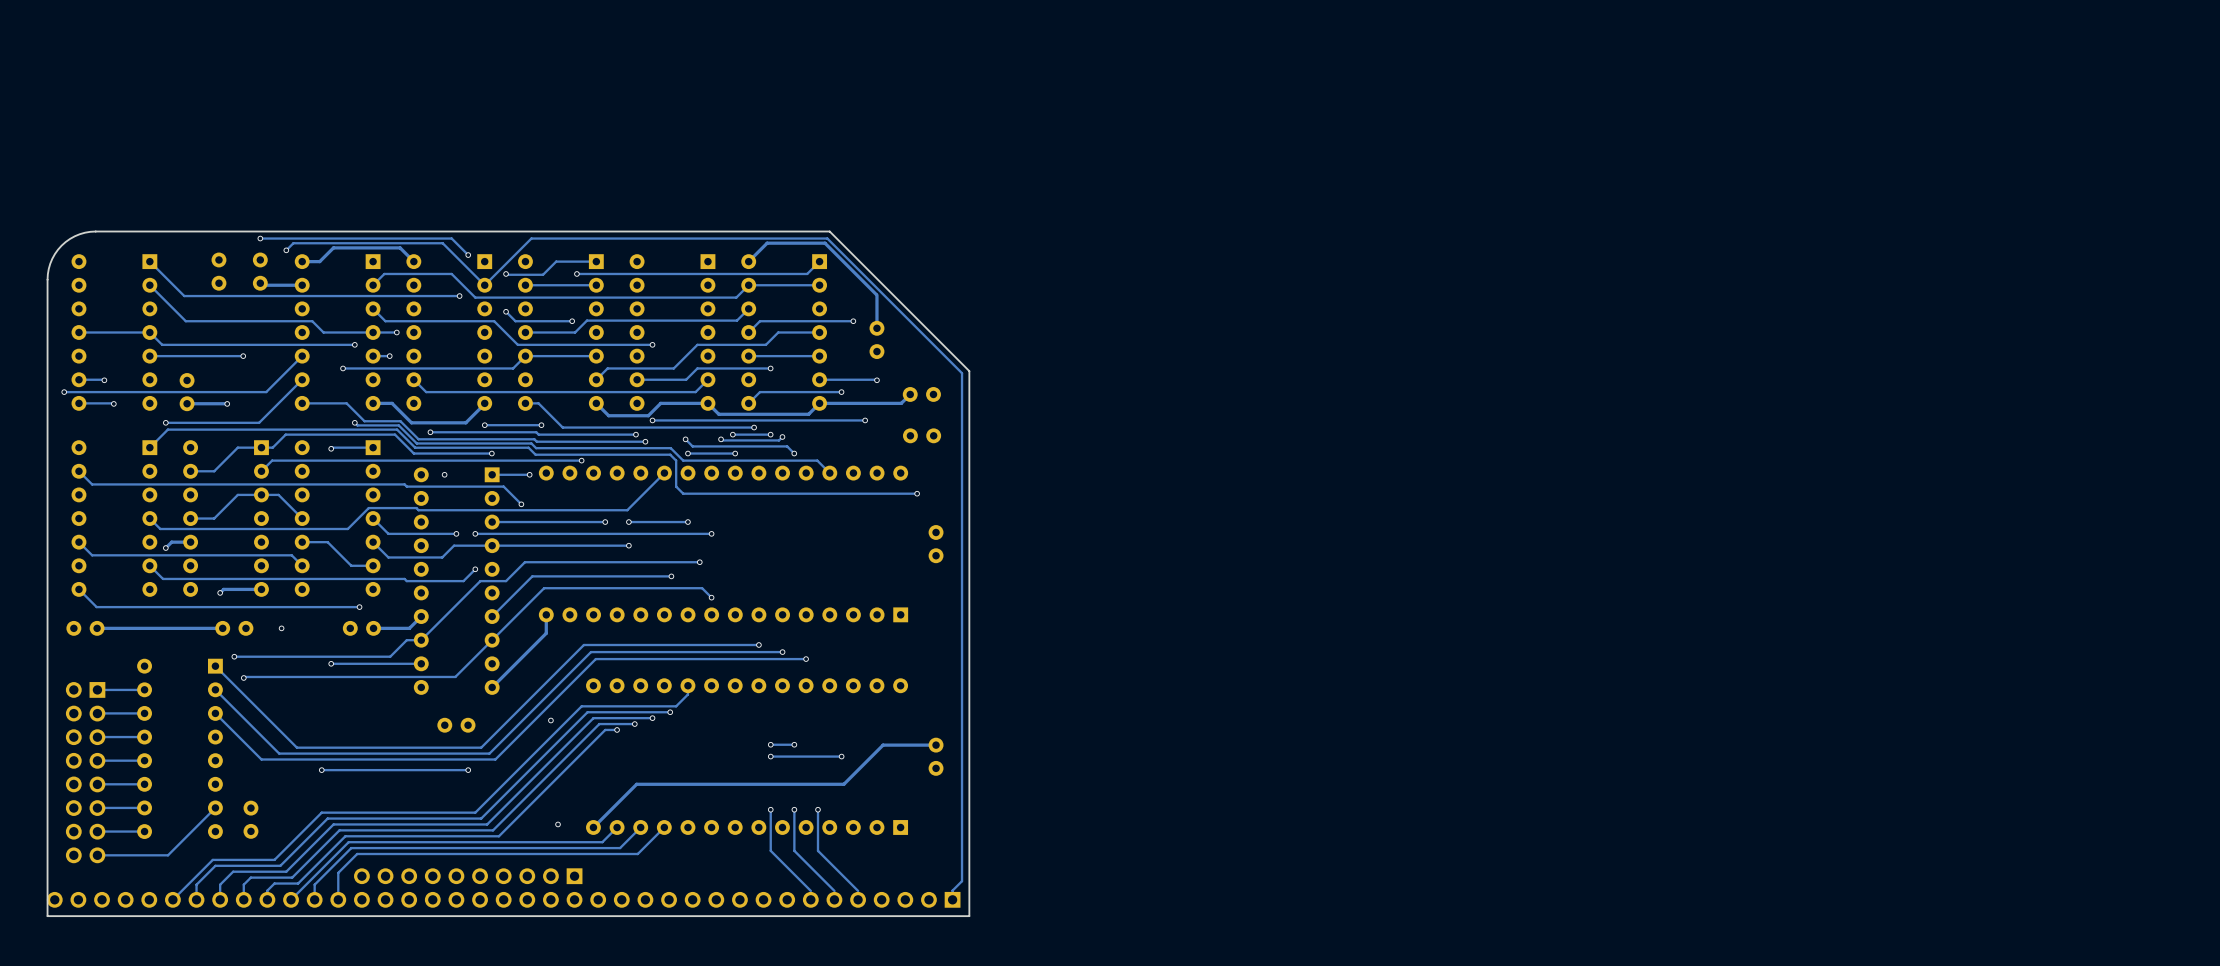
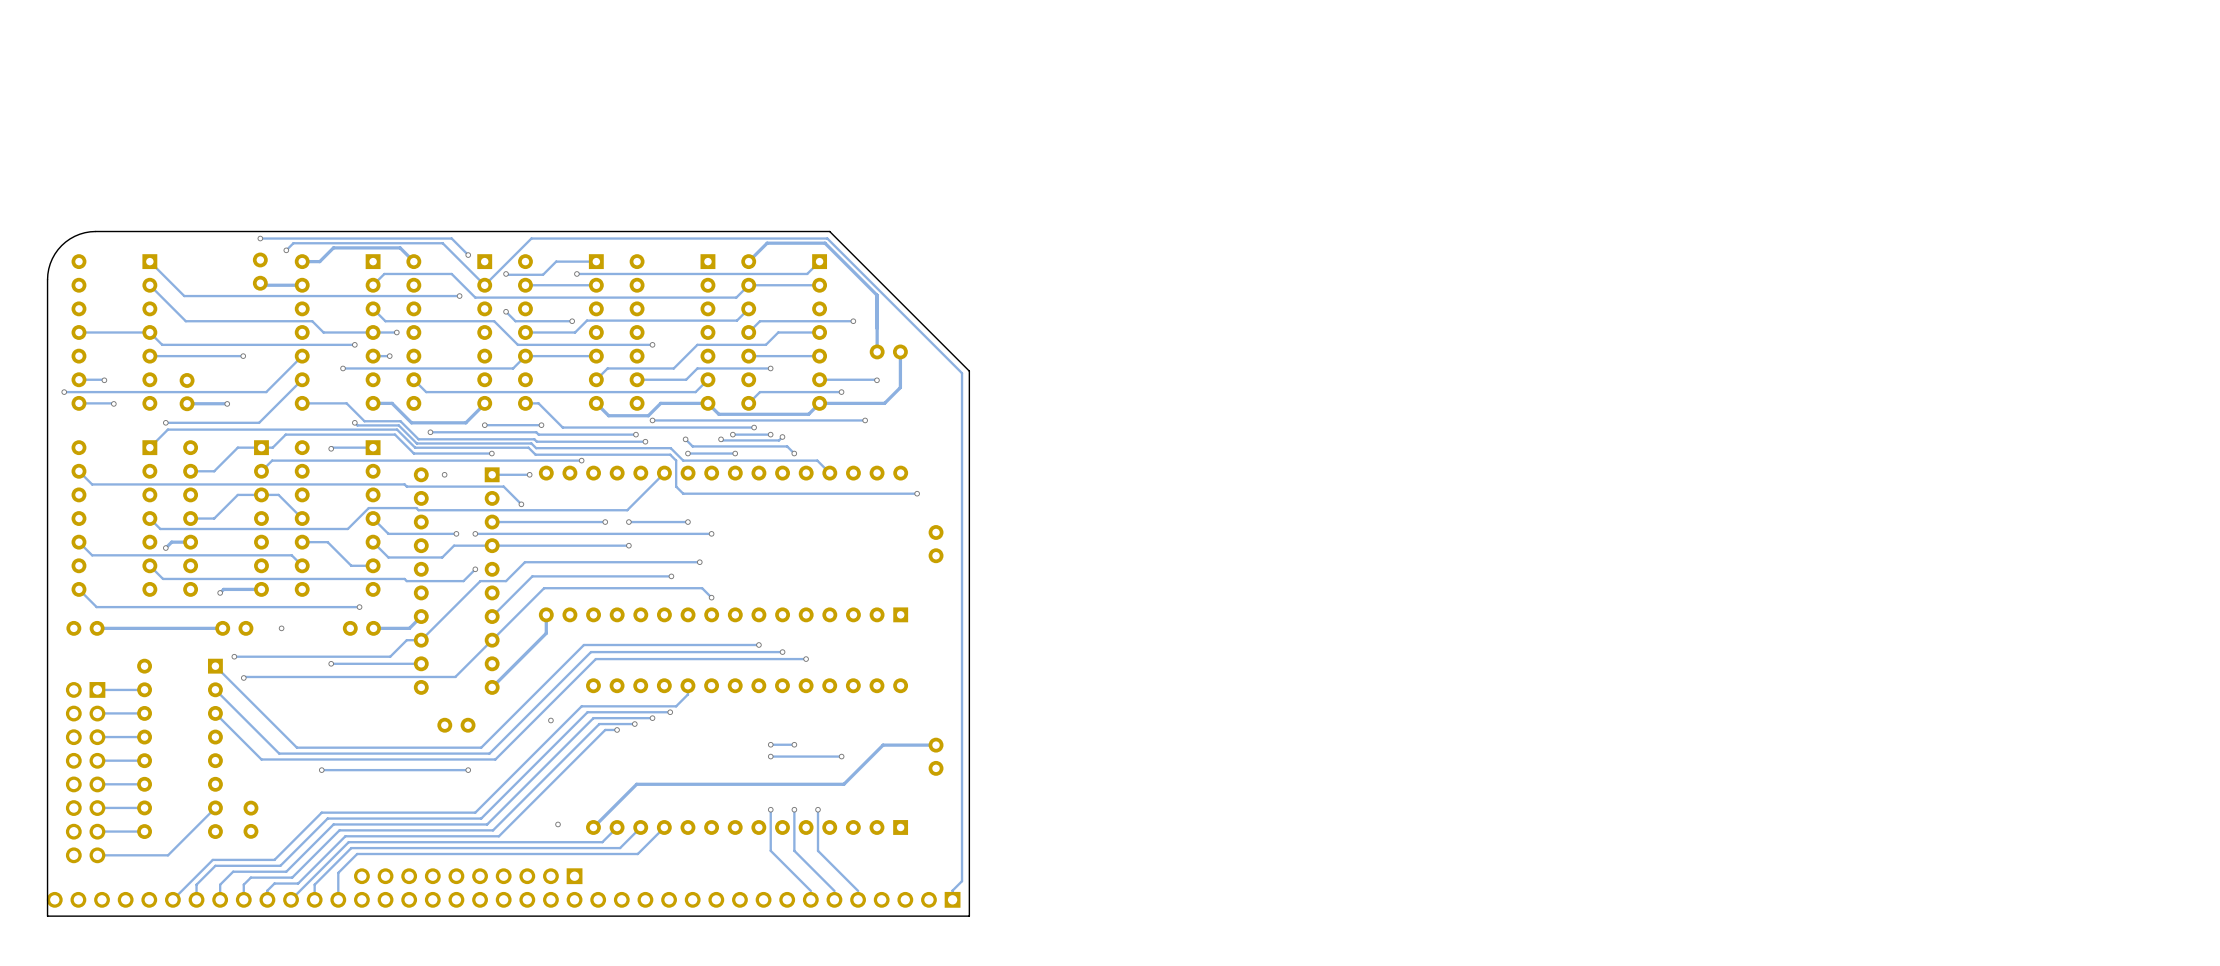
part: (218, 271) -> none
track: none -> (876, 294) (877, 351)
part rotation: 0° (876, 339) -> 90° clockwise (888, 351)
track: (910, 394) (901, 403) (884, 403) -> (900, 351) (900, 387) (884, 403)
part: (921, 394) -> none
part: (922, 435) -> none

